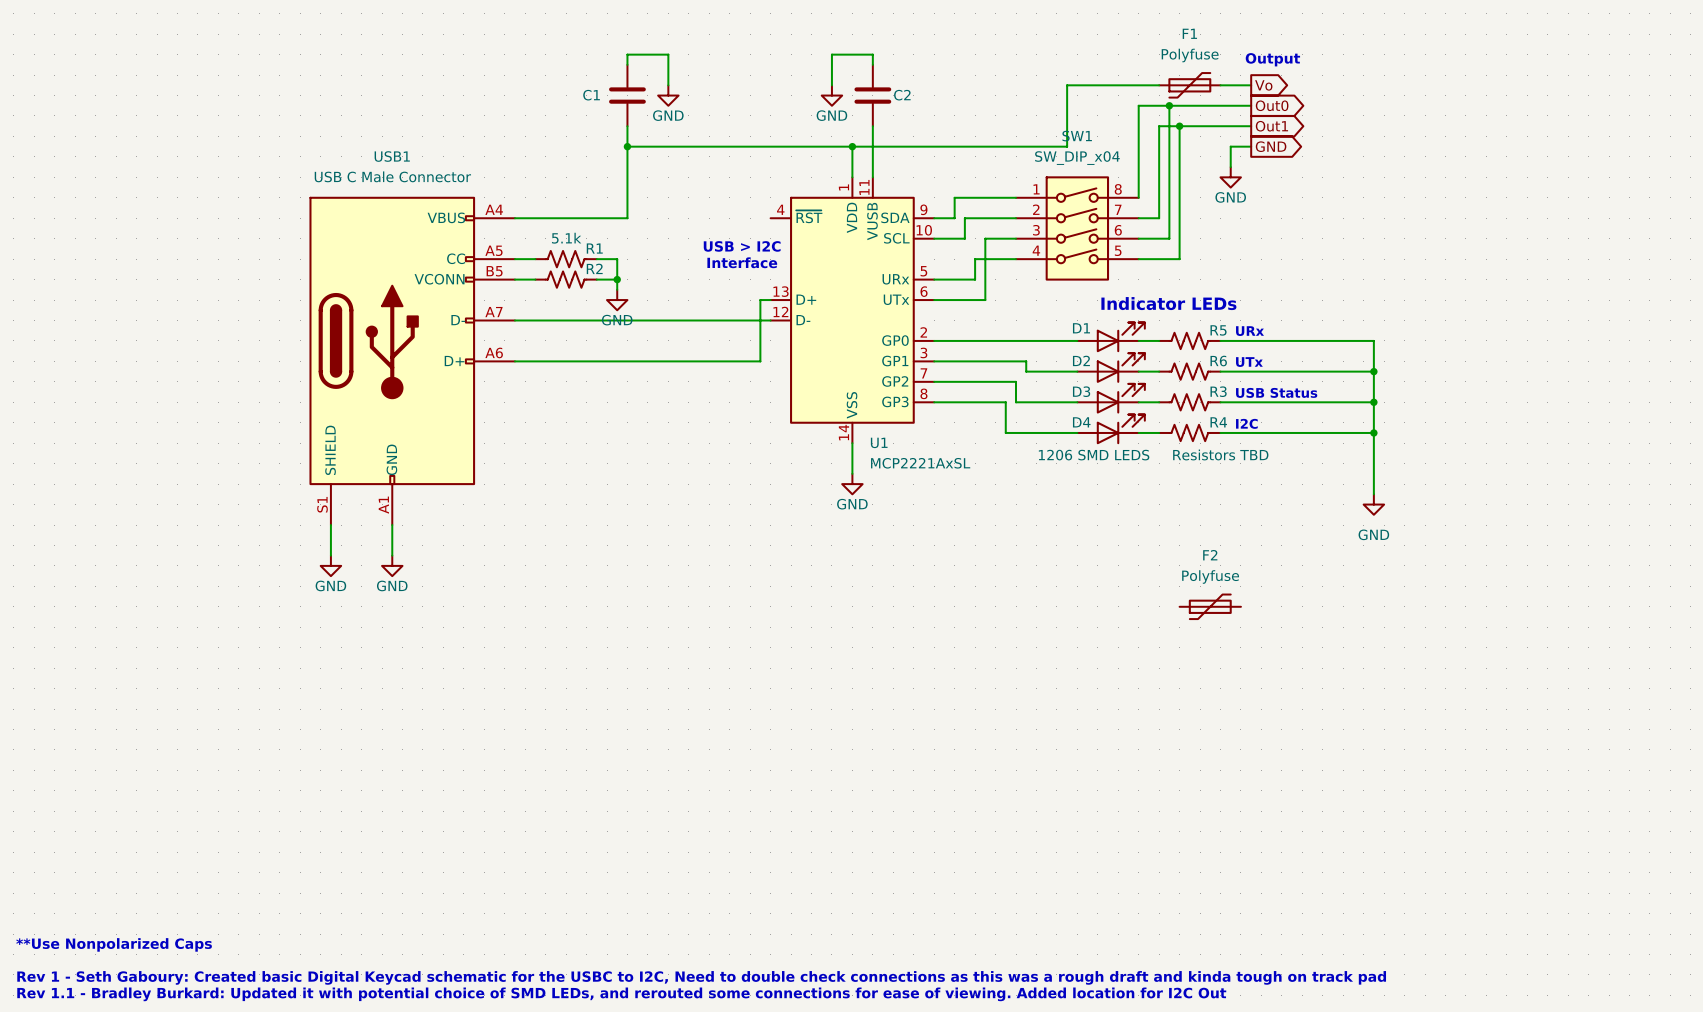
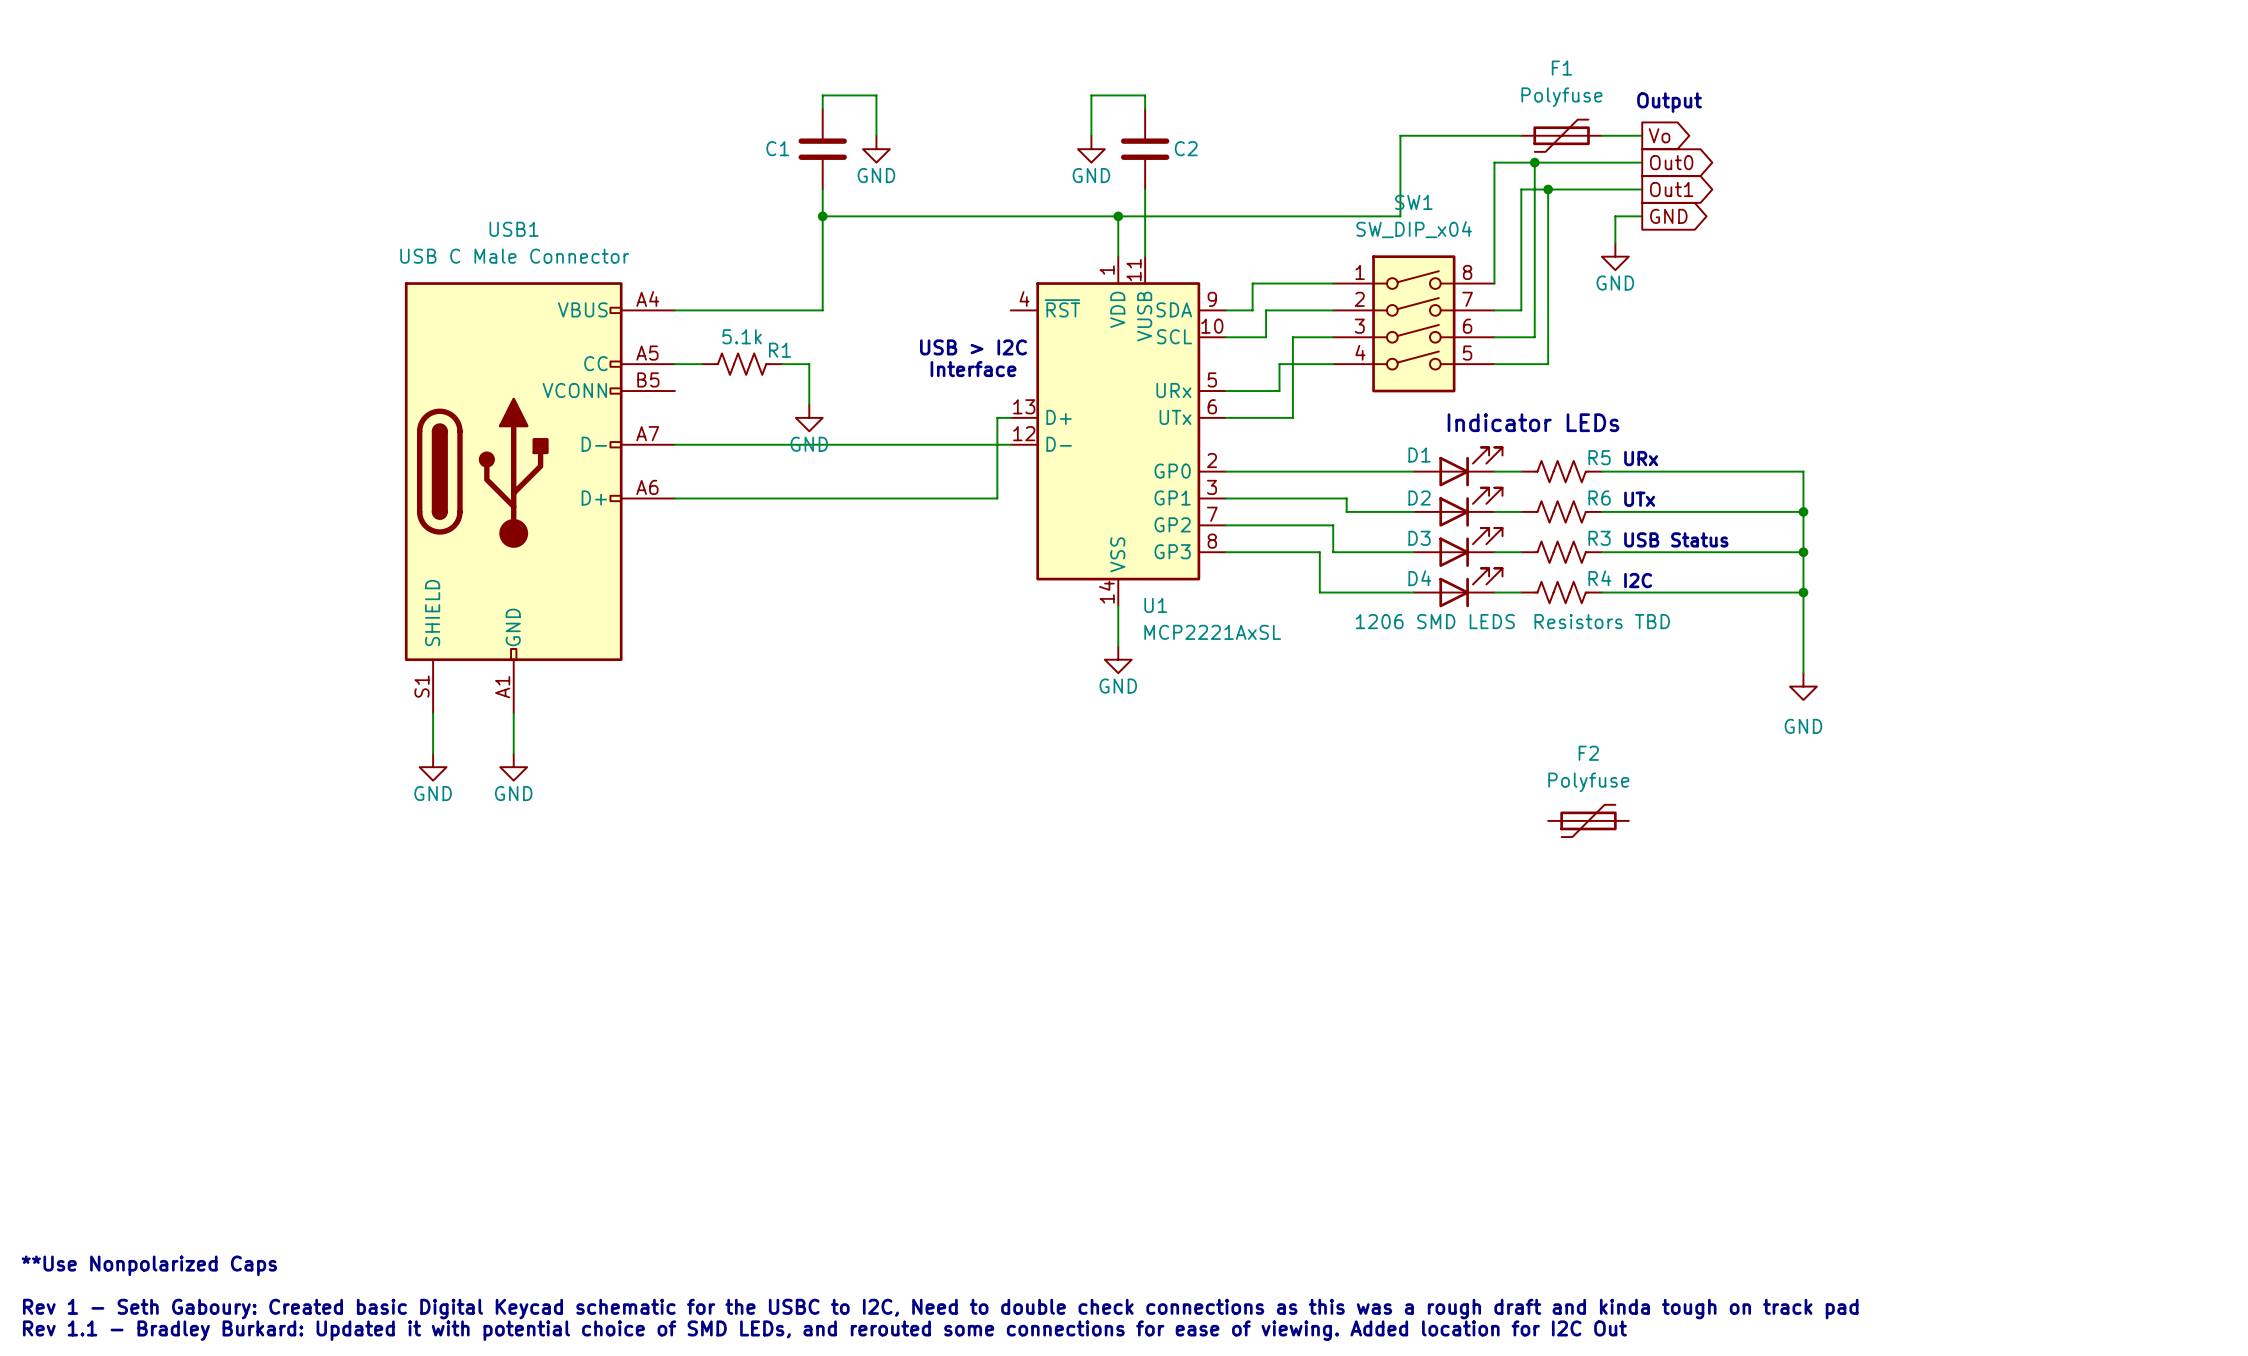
wire: (514, 279) (535, 279) -> none
R2: (566, 279) -> none
wire: (596, 279) (617, 279) -> none
junction: (617, 279) -> none

